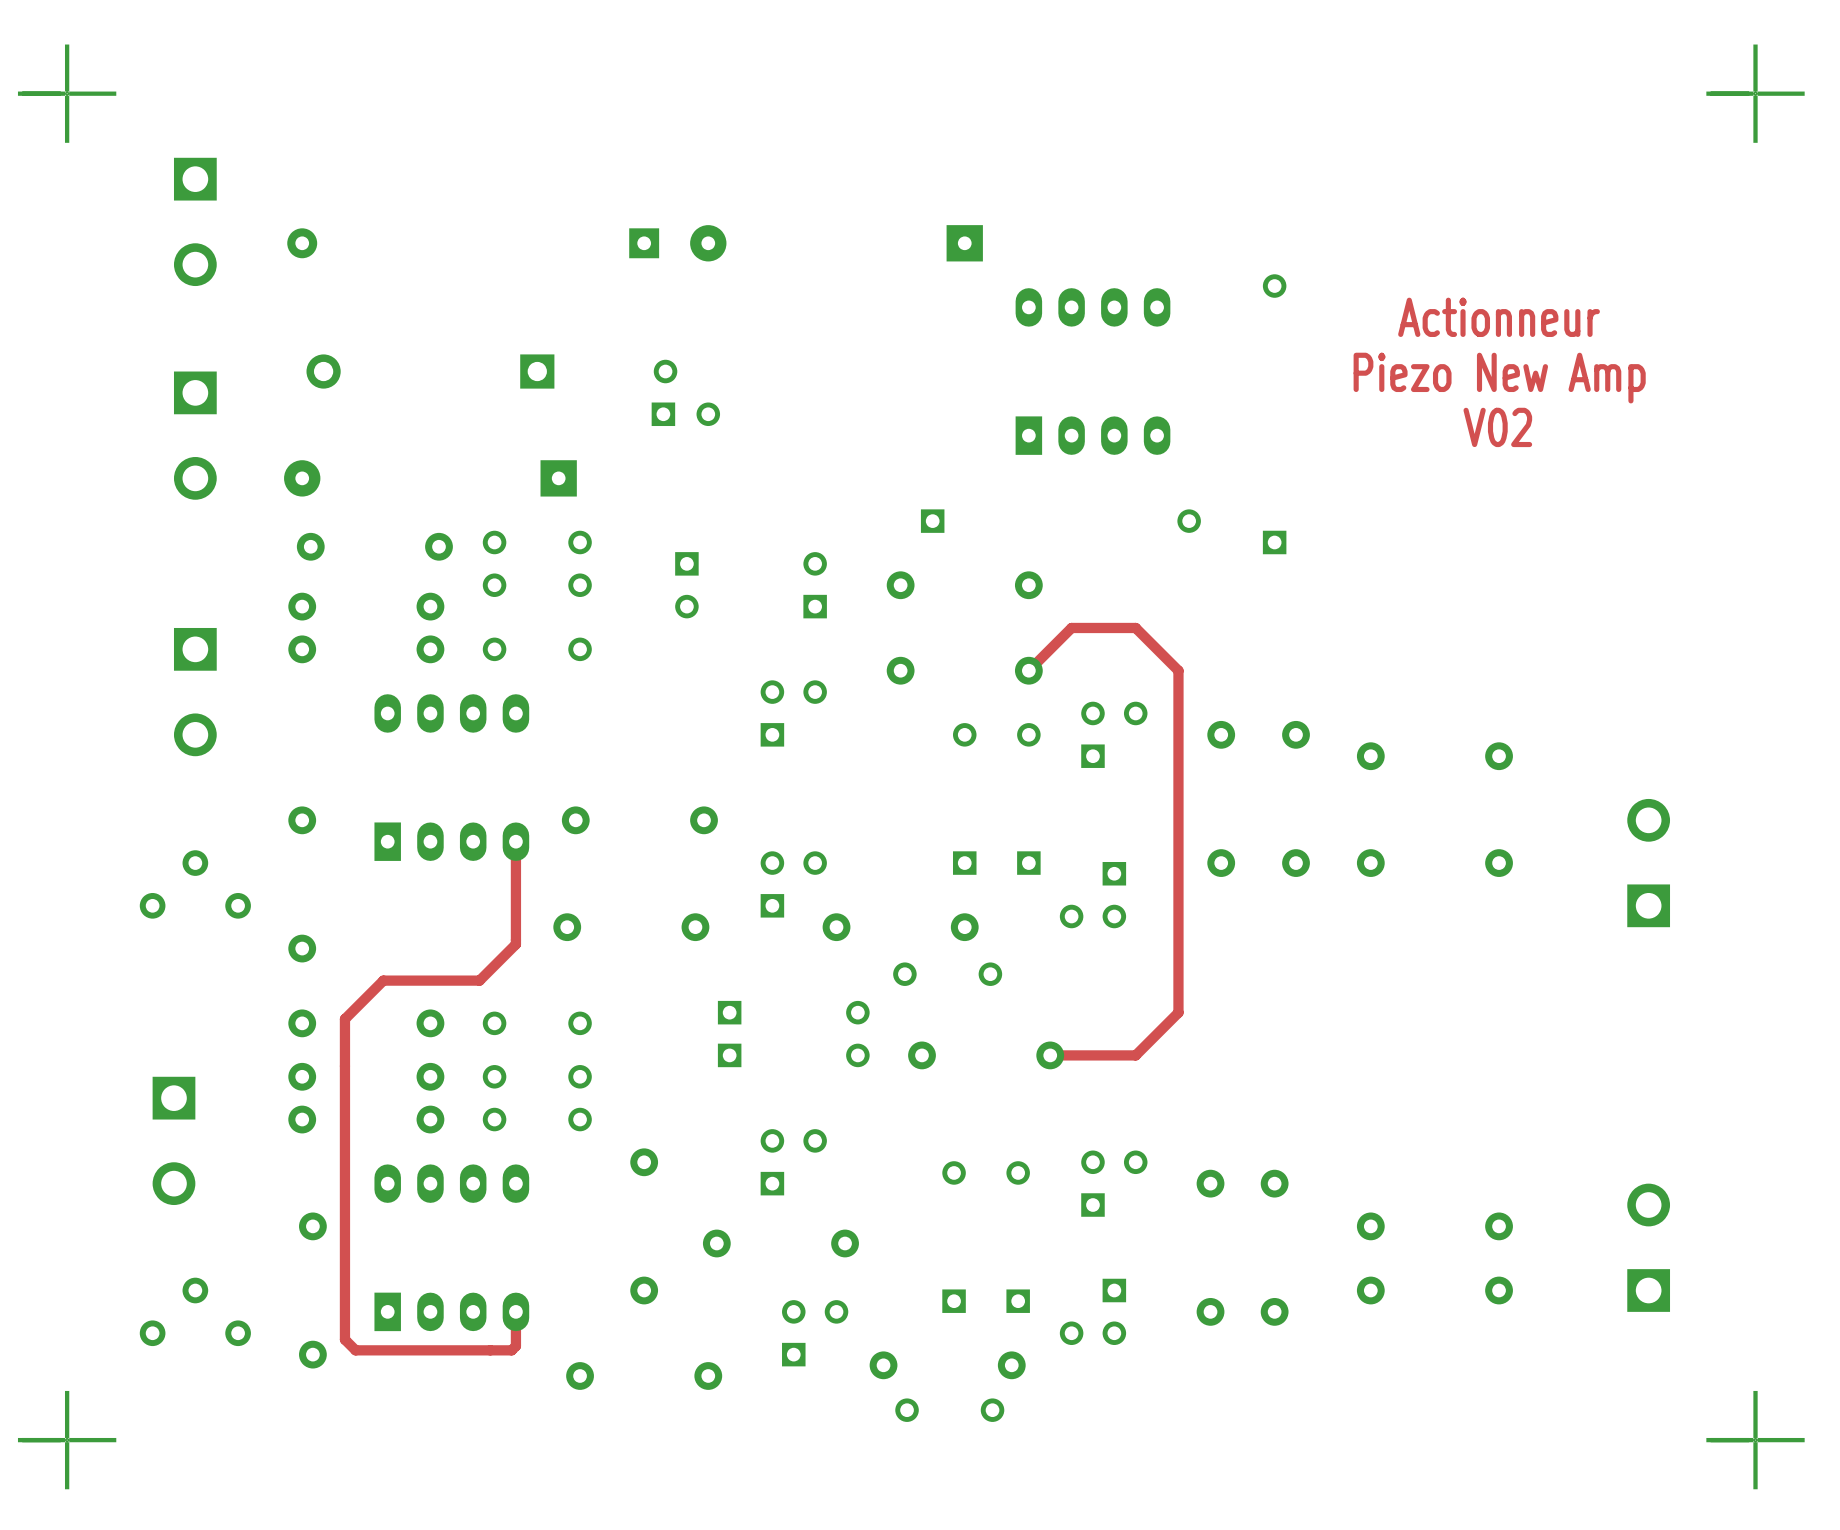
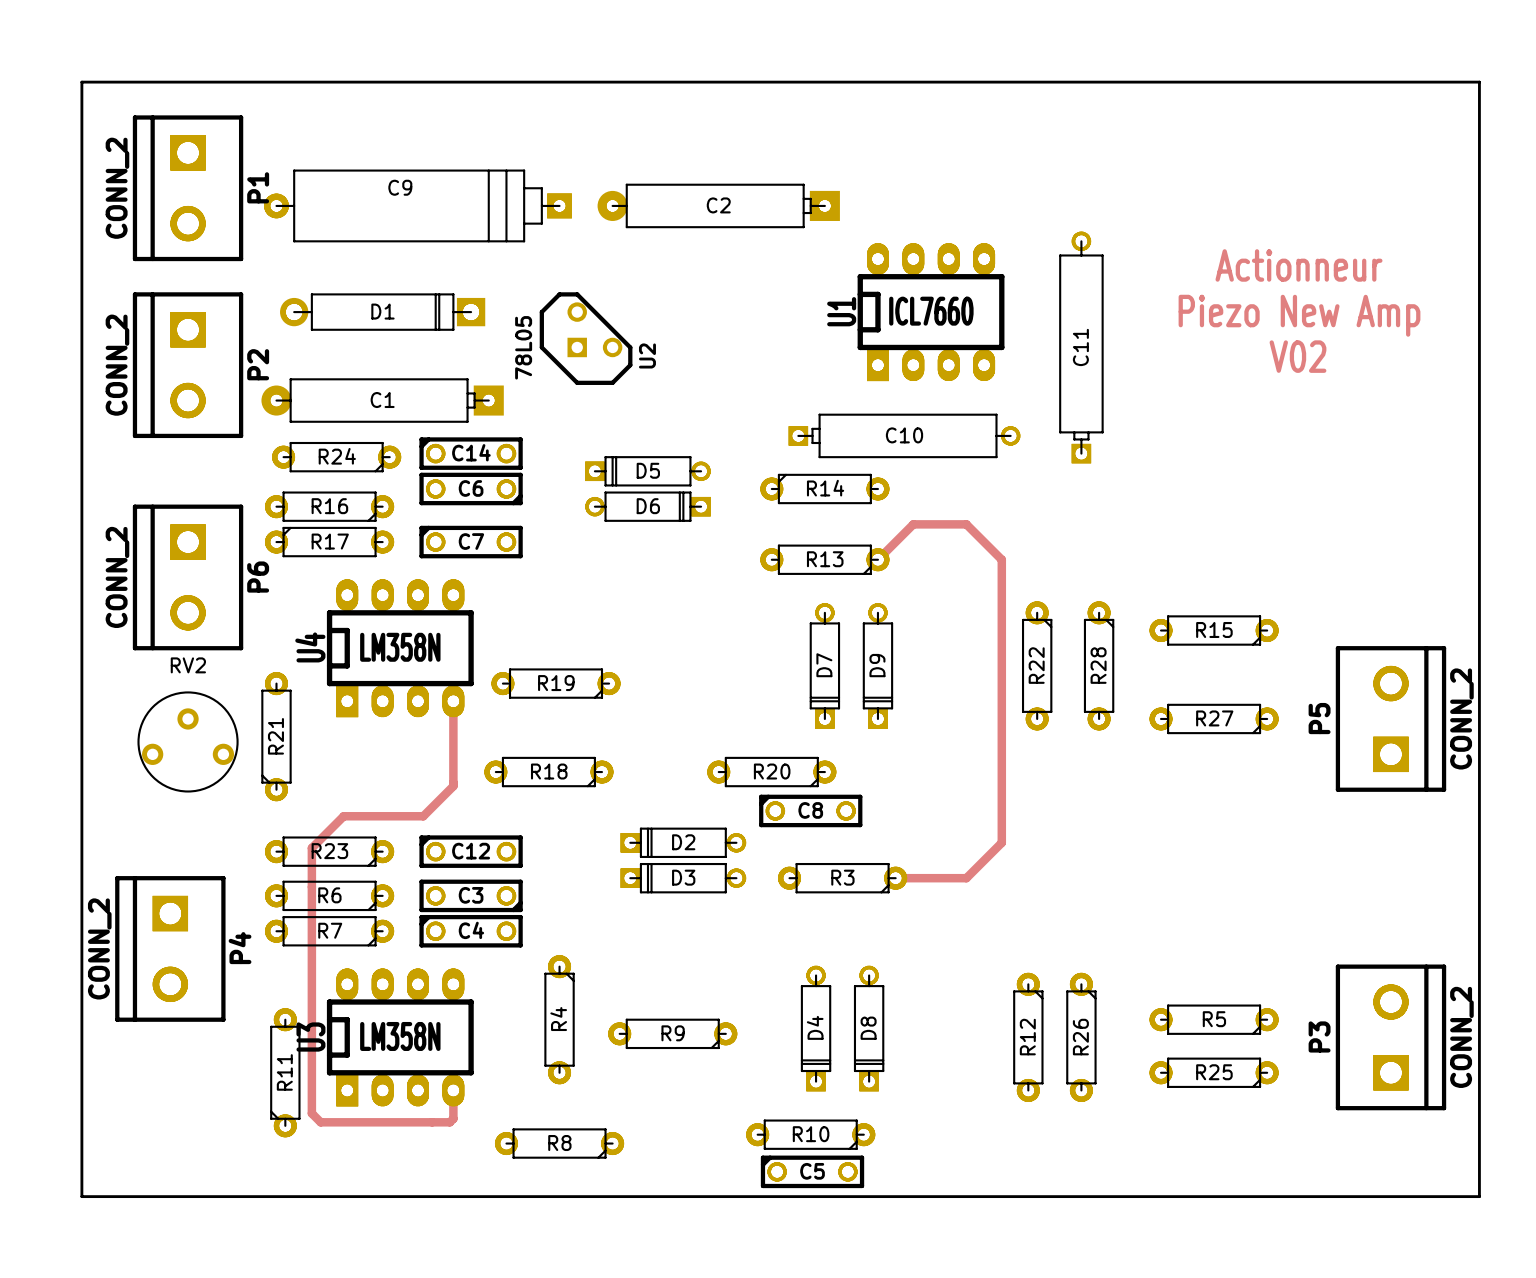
board edge: none -> (81, 82) (81, 1196) (1479, 1196) (1479, 82) (81, 82)
part: (67, 93) -> none
part: (1755, 93) -> none
P1: none -> CONN_2 (188, 188)
C9: none -> (418, 205)
C2: none -> (718, 205)
text position: Actionneur (1499, 317) -> Actionneur (1299, 265)
D1: none -> (382, 312)
U1: none -> ICL7660 (931, 312)
text position: Piezo New Amp (1499, 378) -> Piezo New Amp (1299, 315)
part: (685, 392) -> none
U2: none -> 78L05 (586, 338)
C11: none -> (1081, 347)
text position: V02 (1497, 427) -> V02 (1297, 356)
P2: none -> CONN_2 (188, 365)
C1: none -> (382, 400)
C10: none -> (904, 435)
C14: none -> (471, 453)
R24: none -> (336, 457)
D5: none -> (647, 471)
C6: none -> (471, 488)
R14: none -> (824, 488)
R16: none -> (329, 506)
D6: none -> (647, 506)
R17: none -> (329, 542)
C7: none -> (471, 542)
R13: none -> (824, 559)
P6: none -> CONN_2 (188, 577)
part: (793, 713) -> none
part: (1114, 734) -> none
R15: none -> (1214, 630)
U4: none -> LM358N (400, 648)
D7: none -> (824, 665)
D9: none -> (877, 665)
R22: none -> (1037, 665)
R28: none -> (1099, 665)
R19: none -> (556, 683)
R27: none -> (1214, 718)
P5: none -> CONN_2 (1390, 718)
part: (195, 884) -> none
R21: none -> (276, 736)
part: (793, 884) -> none
RV2: none -> (188, 741)
part: (1092, 895) -> none
R18: none -> (548, 772)
R20: none -> (771, 772)
C8: none -> (810, 810)
D2: none -> (683, 842)
R23: none -> (329, 851)
C12: none -> (471, 851)
D3: none -> (683, 878)
R3: none -> (842, 878)
R6: none -> (329, 895)
C3: none -> (471, 895)
R7: none -> (329, 931)
C4: none -> (471, 931)
P4: none -> CONN_2 (170, 948)
part: (793, 1162) -> none
part: (1114, 1183) -> none
R4: none -> (559, 1019)
R5: none -> (1214, 1019)
D4: none -> (816, 1028)
D8: none -> (869, 1028)
R9: none -> (672, 1033)
U3: none -> LM358N (400, 1037)
R12: none -> (1028, 1037)
R26: none -> (1081, 1037)
P3: none -> CONN_2 (1390, 1037)
R11: none -> (285, 1072)
R25: none -> (1214, 1072)
part: (195, 1311) -> none
part: (1092, 1311) -> none
part: (815, 1333) -> none
R10: none -> (810, 1134)
R8: none -> (559, 1143)
C5: none -> (812, 1171)
part: (67, 1440) -> none
part: (1755, 1440) -> none

